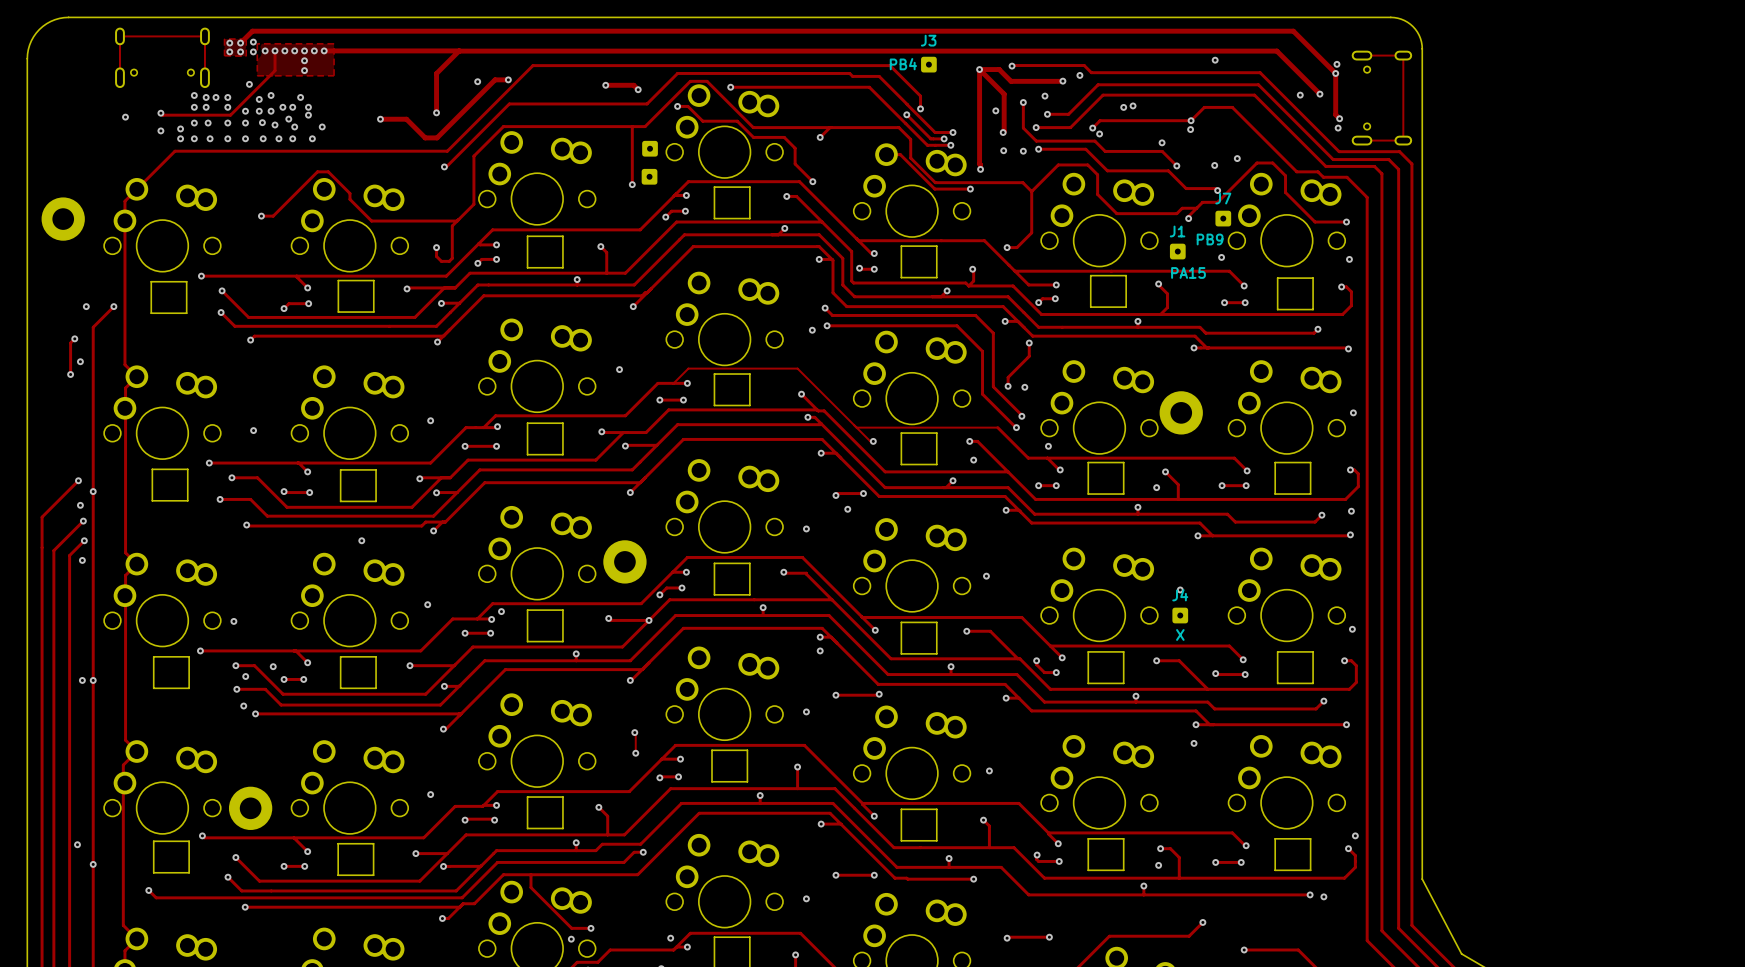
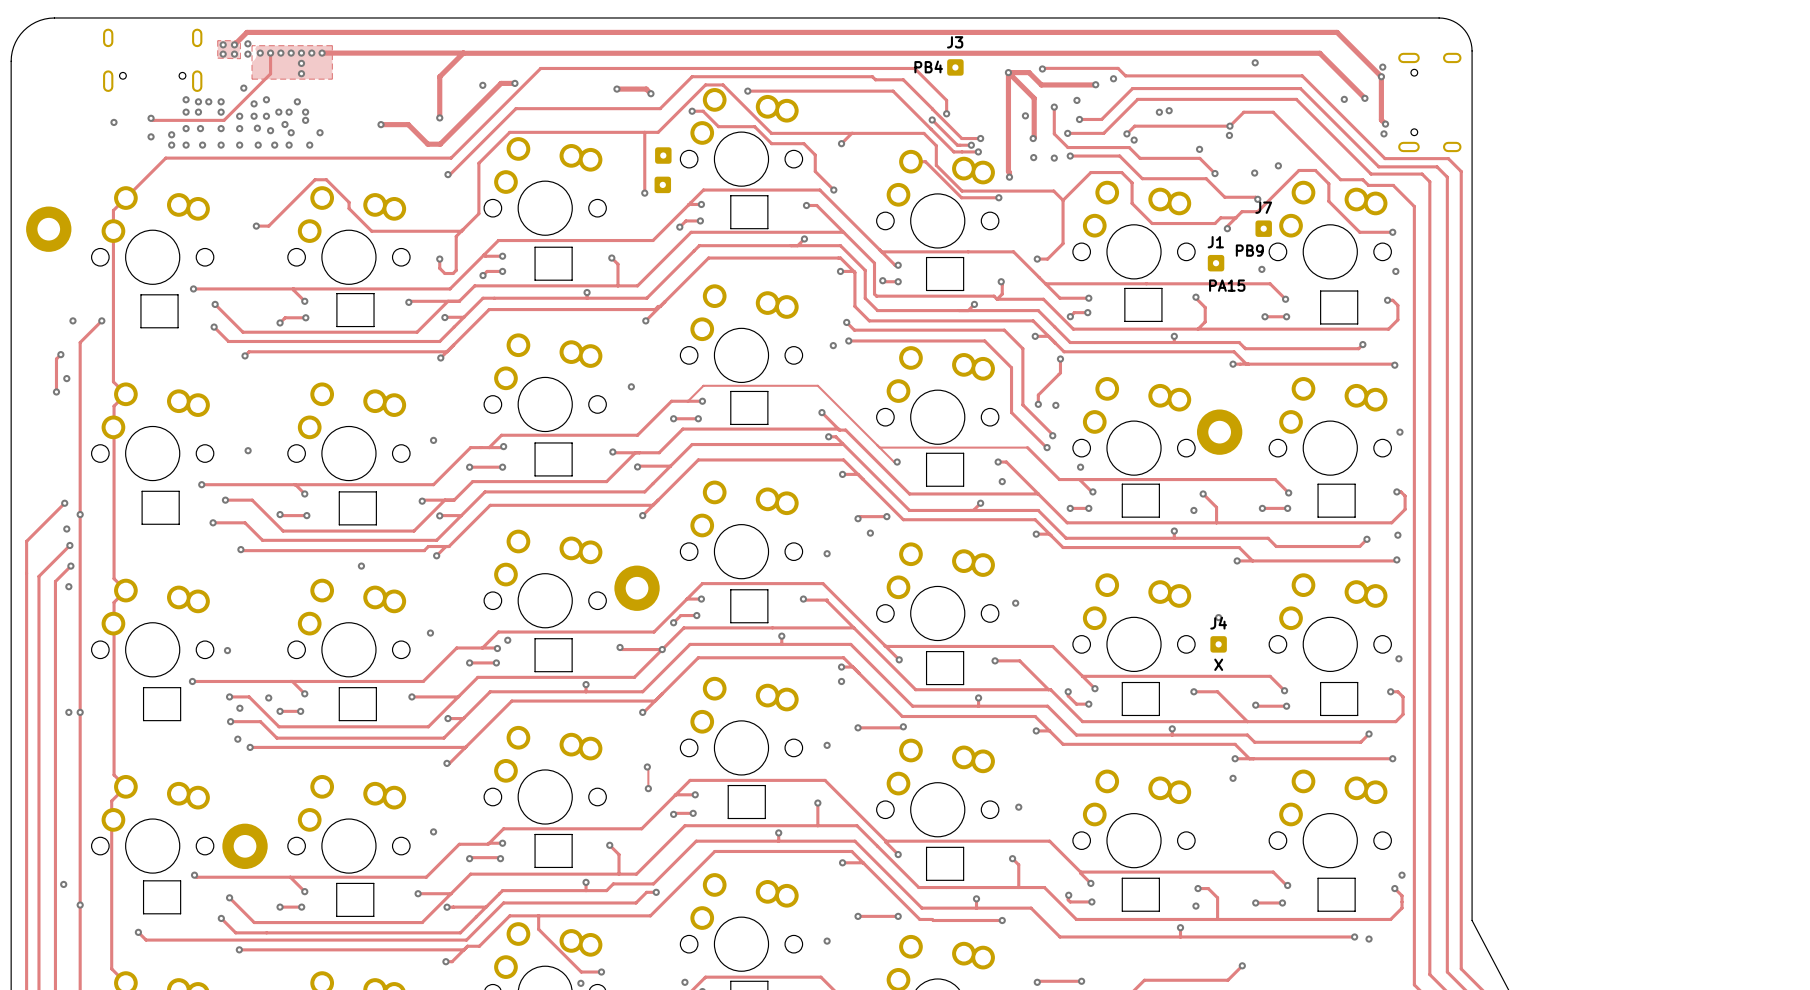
track: (1362, 55) (1403, 55) (1403, 140) (1362, 140) -> none
track: (119, 77) (119, 36) (204, 36) (204, 77) -> none

